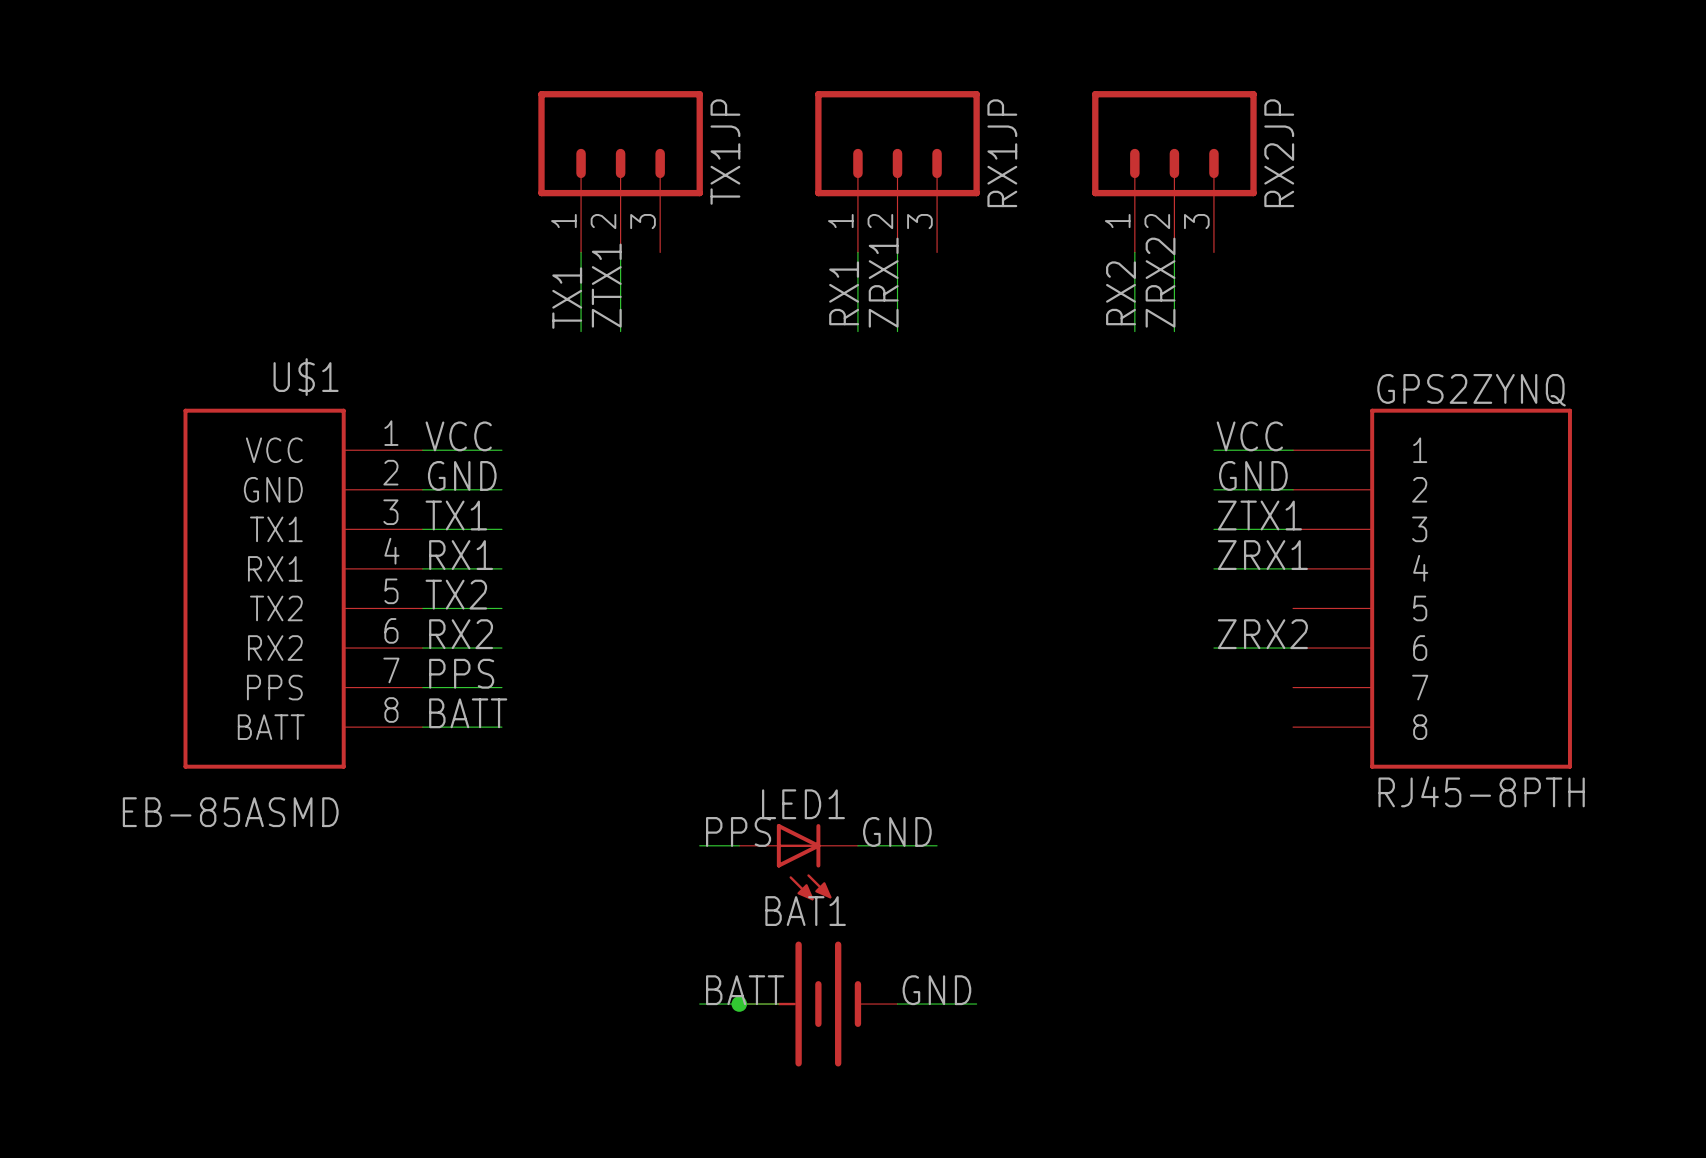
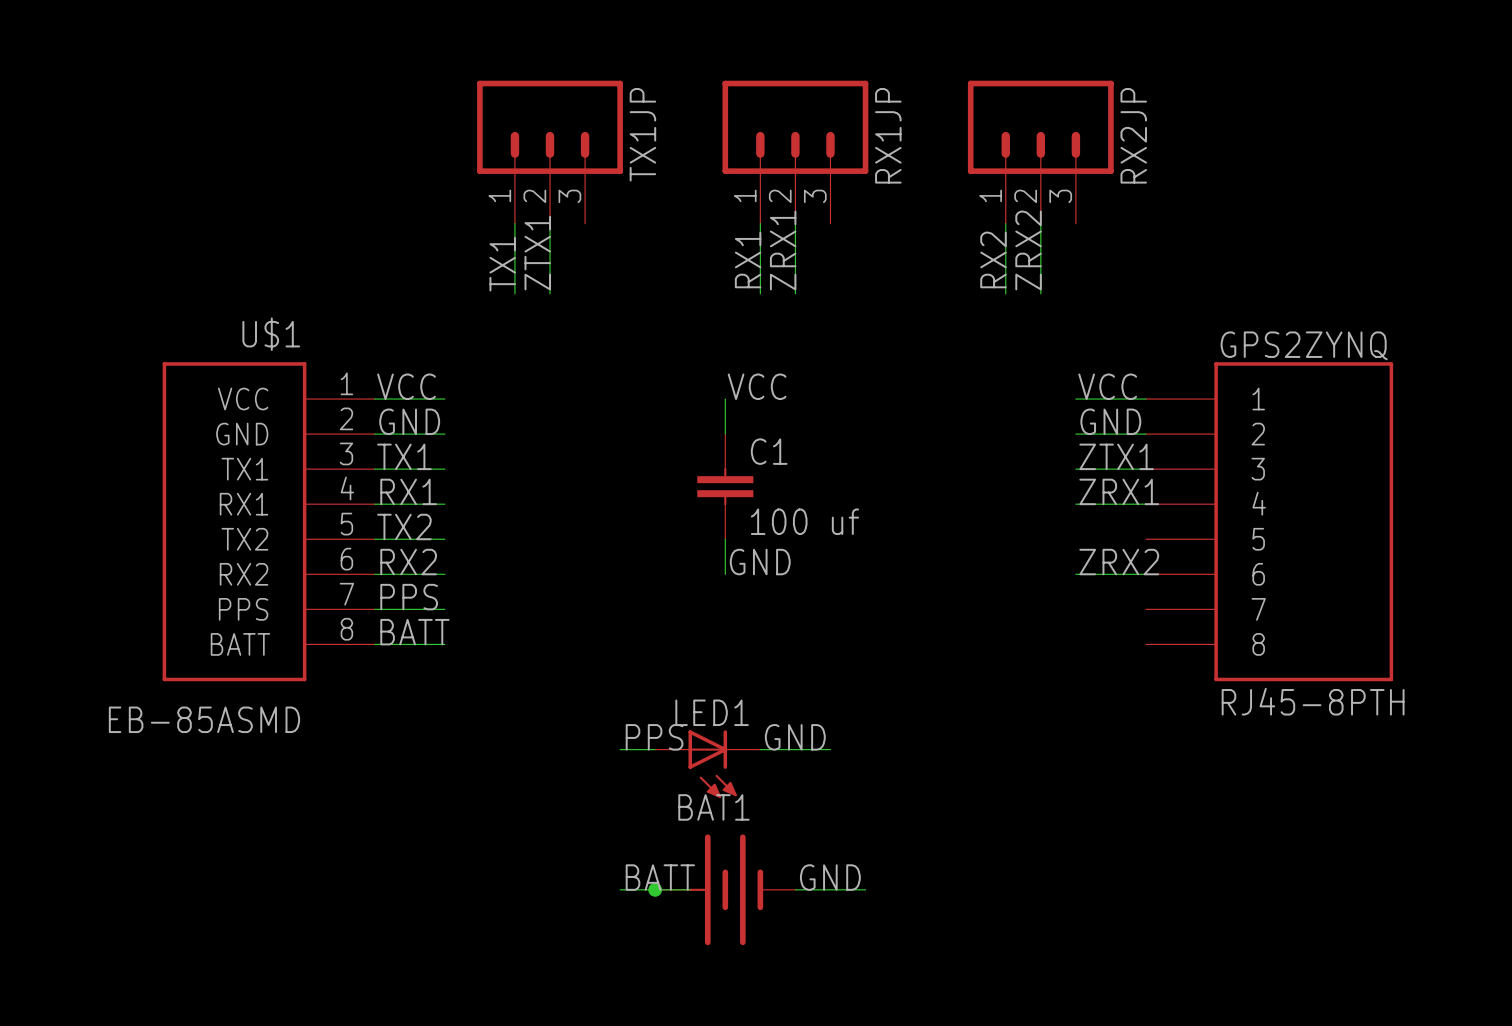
label: none -> VCC (757, 386)
wire: none -> (725, 399) (725, 434)
C1: none -> 100 uf (725, 486)
wire: none -> (725, 539) (725, 574)
label: none -> GND (760, 562)

